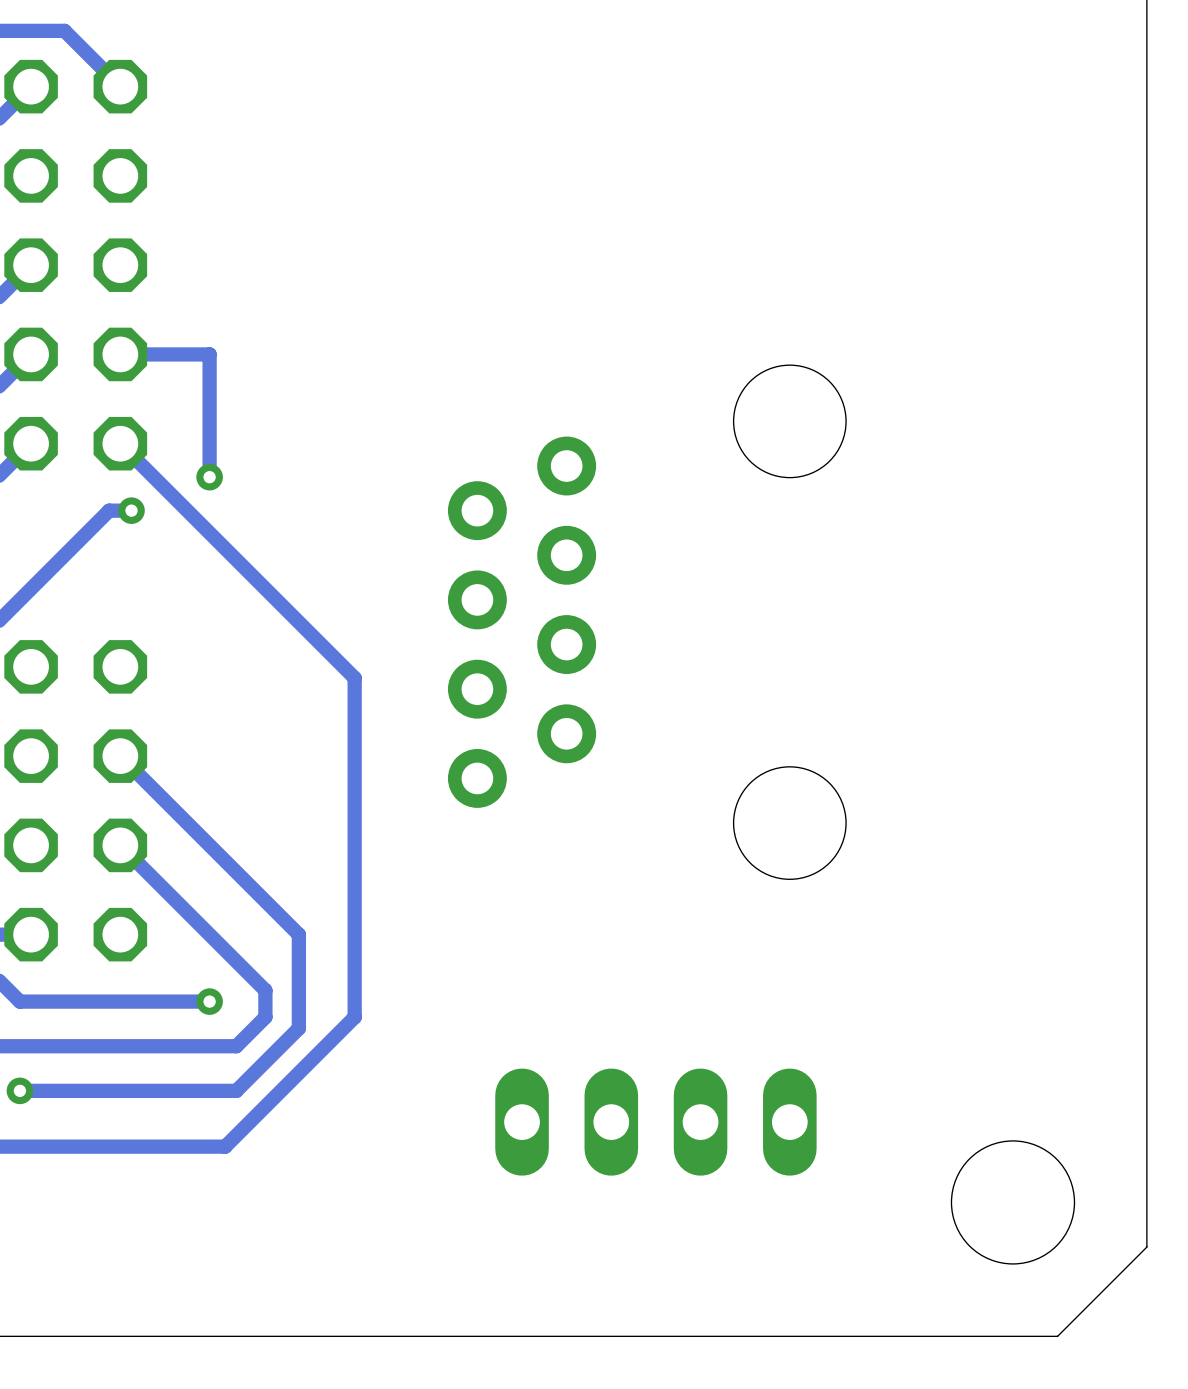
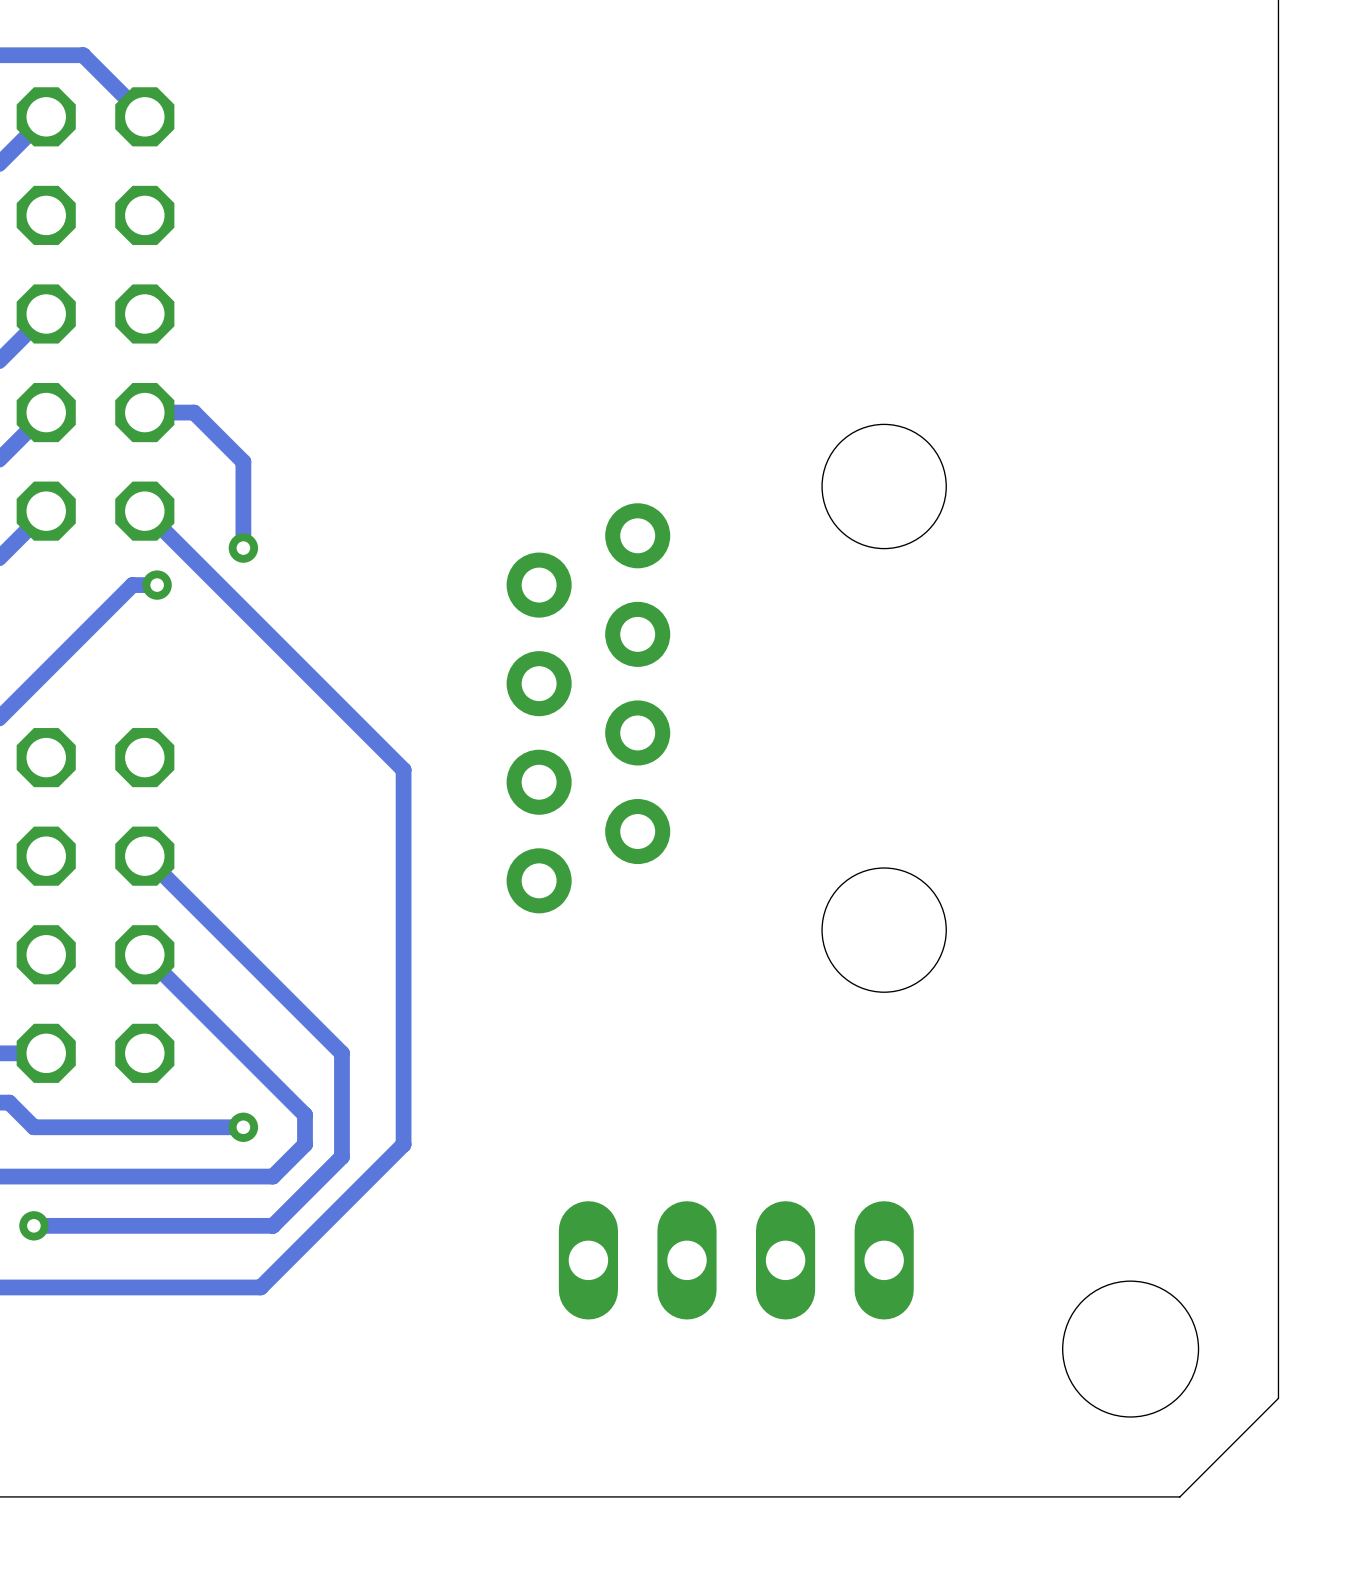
track: (164, 354) (209, 354) (209, 399) -> (194, 412) (243, 461)

